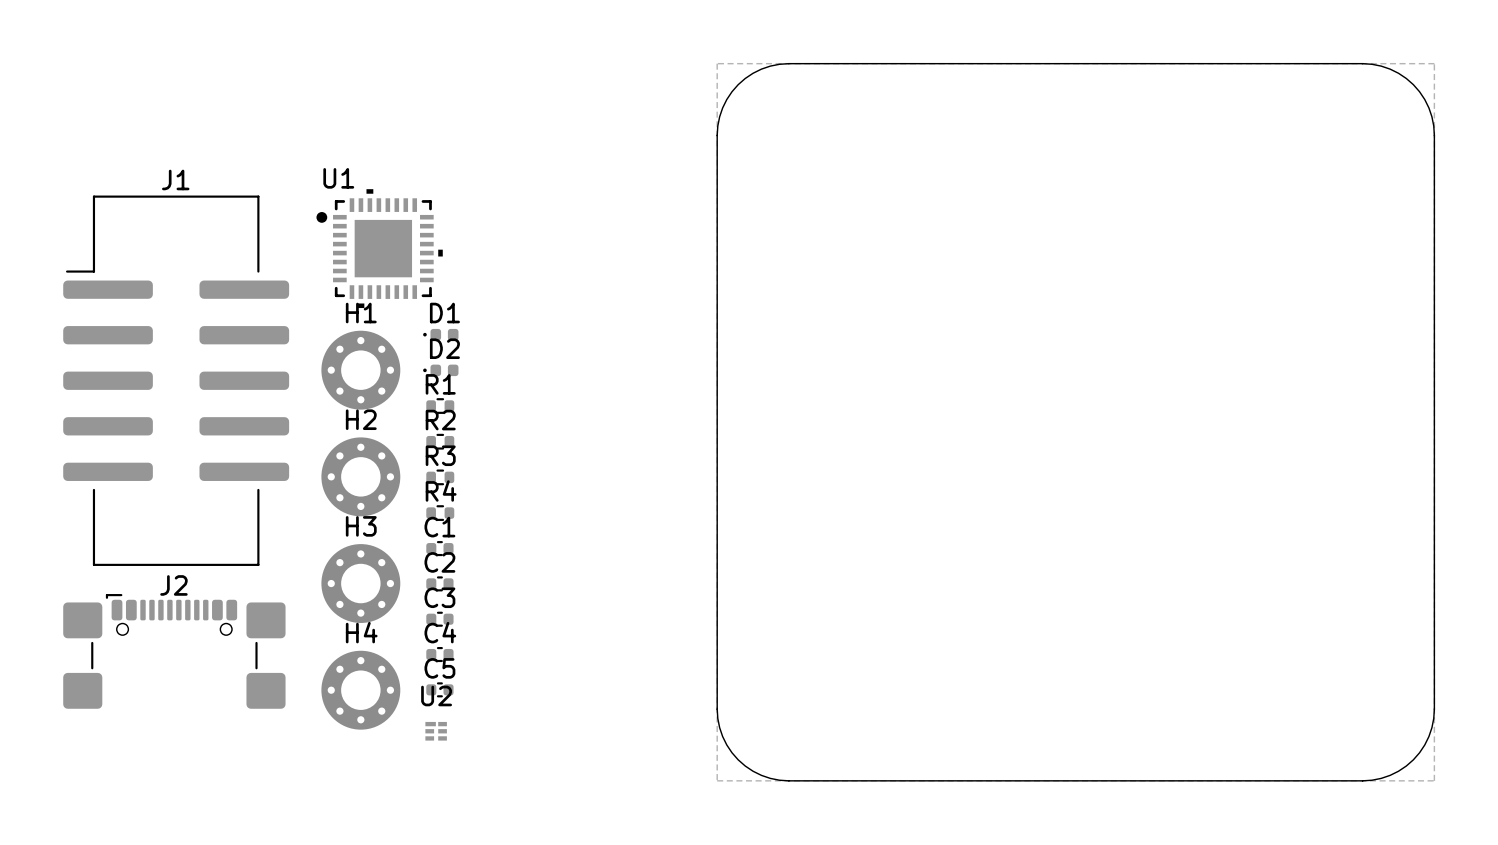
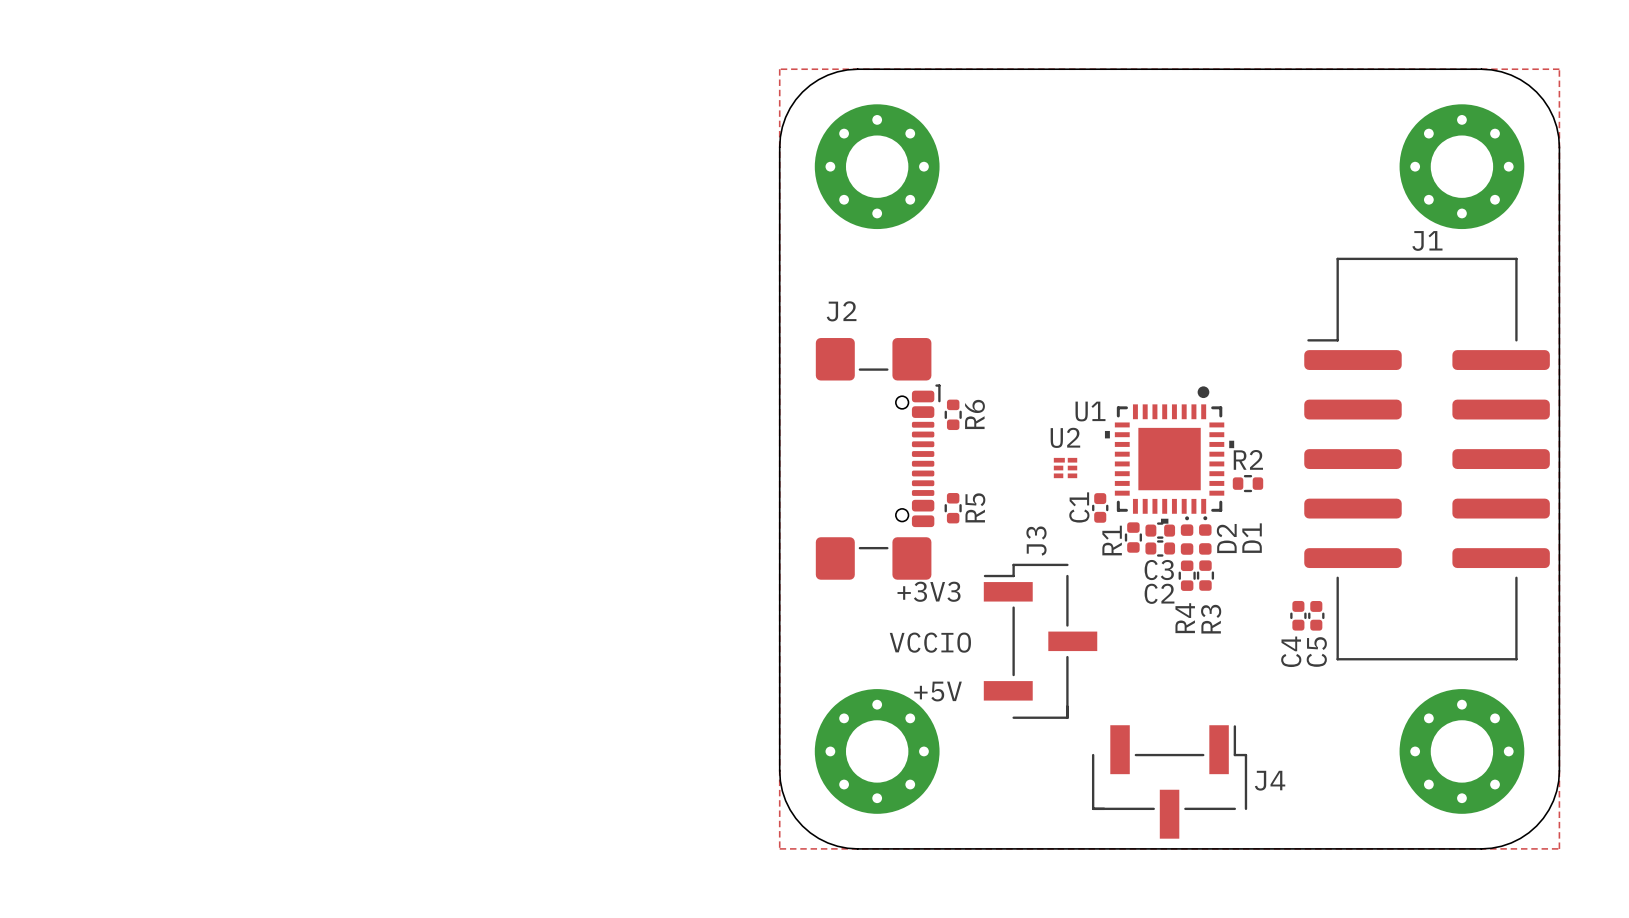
part: none -> (877, 166)
part: none -> (1461, 166)
U1 name position: U1 (338, 178) -> U1 (1090, 411)
U1 rotation: 0° (379, 248) -> 90° clockwise (1169, 455)
U1 position: (379, 248) -> (1169, 455)
D1 rotation: 0° (440, 334) -> 90° clockwise (1205, 535)
D1 position: (440, 334) -> (1205, 535)
H1: (360, 370) -> none
D2 rotation: 0° (440, 370) -> 90° clockwise (1187, 535)
D2 position: (440, 370) -> (1187, 535)
J1 position: (176, 380) -> (1427, 459)
R6: none -> (953, 414)
R1 rotation: 0° (440, 406) -> 90° clockwise (1133, 537)
R1 position: (440, 406) -> (1133, 537)
R2 position: (440, 441) -> (1247, 483)
R3 name position: R3 (440, 455) -> R3 (1211, 619)
R5: none -> (953, 508)
H2: (360, 476) -> none
R3 rotation: 0° (440, 477) -> 90° clockwise (1205, 575)
R3 position: (440, 477) -> (1205, 575)
R4 name position: R4 (441, 490) -> R4 (1185, 618)
R4 rotation: 0° (440, 513) -> 90° clockwise (1187, 575)
R4 position: (440, 513) -> (1187, 575)
text: none -> +3V3 (929, 591)
C1 rotation: 0° (439, 548) -> 90° clockwise (1100, 507)
C1 position: (439, 548) -> (1100, 507)
C2 name position: C2 (439, 562) -> C2 (1159, 593)
H3: (360, 583) -> none
C2 position: (439, 583) -> (1160, 548)
J2 name position: J2 (173, 585) -> J2 (841, 311)
J3: none -> (1040, 641)
text: none -> VCCIO (930, 642)
C3 name position: C3 (439, 597) -> C3 (1159, 570)
C3 position: (439, 619) -> (1160, 530)
C4 name position: C4 (440, 632) -> C4 (1291, 651)
text: none -> +5V (938, 691)
J2 rotation: 0° (174, 651) -> 90° clockwise (878, 458)
J2 position: (174, 651) -> (878, 458)
C4 rotation: 0° (439, 654) -> 90° clockwise (1298, 615)
C4 position: (439, 654) -> (1298, 615)
C5 name position: C5 (439, 668) -> C5 (1316, 651)
C5 rotation: 0° (439, 689) -> 90° clockwise (1316, 615)
C5 position: (439, 689) -> (1316, 615)
H4: (360, 690) -> none
part: none -> (877, 751)
part: none -> (1461, 751)
U2 name position: U2 (436, 695) -> U2 (1065, 437)
J4: none -> (1169, 781)
U2 position: (436, 731) -> (1065, 468)

